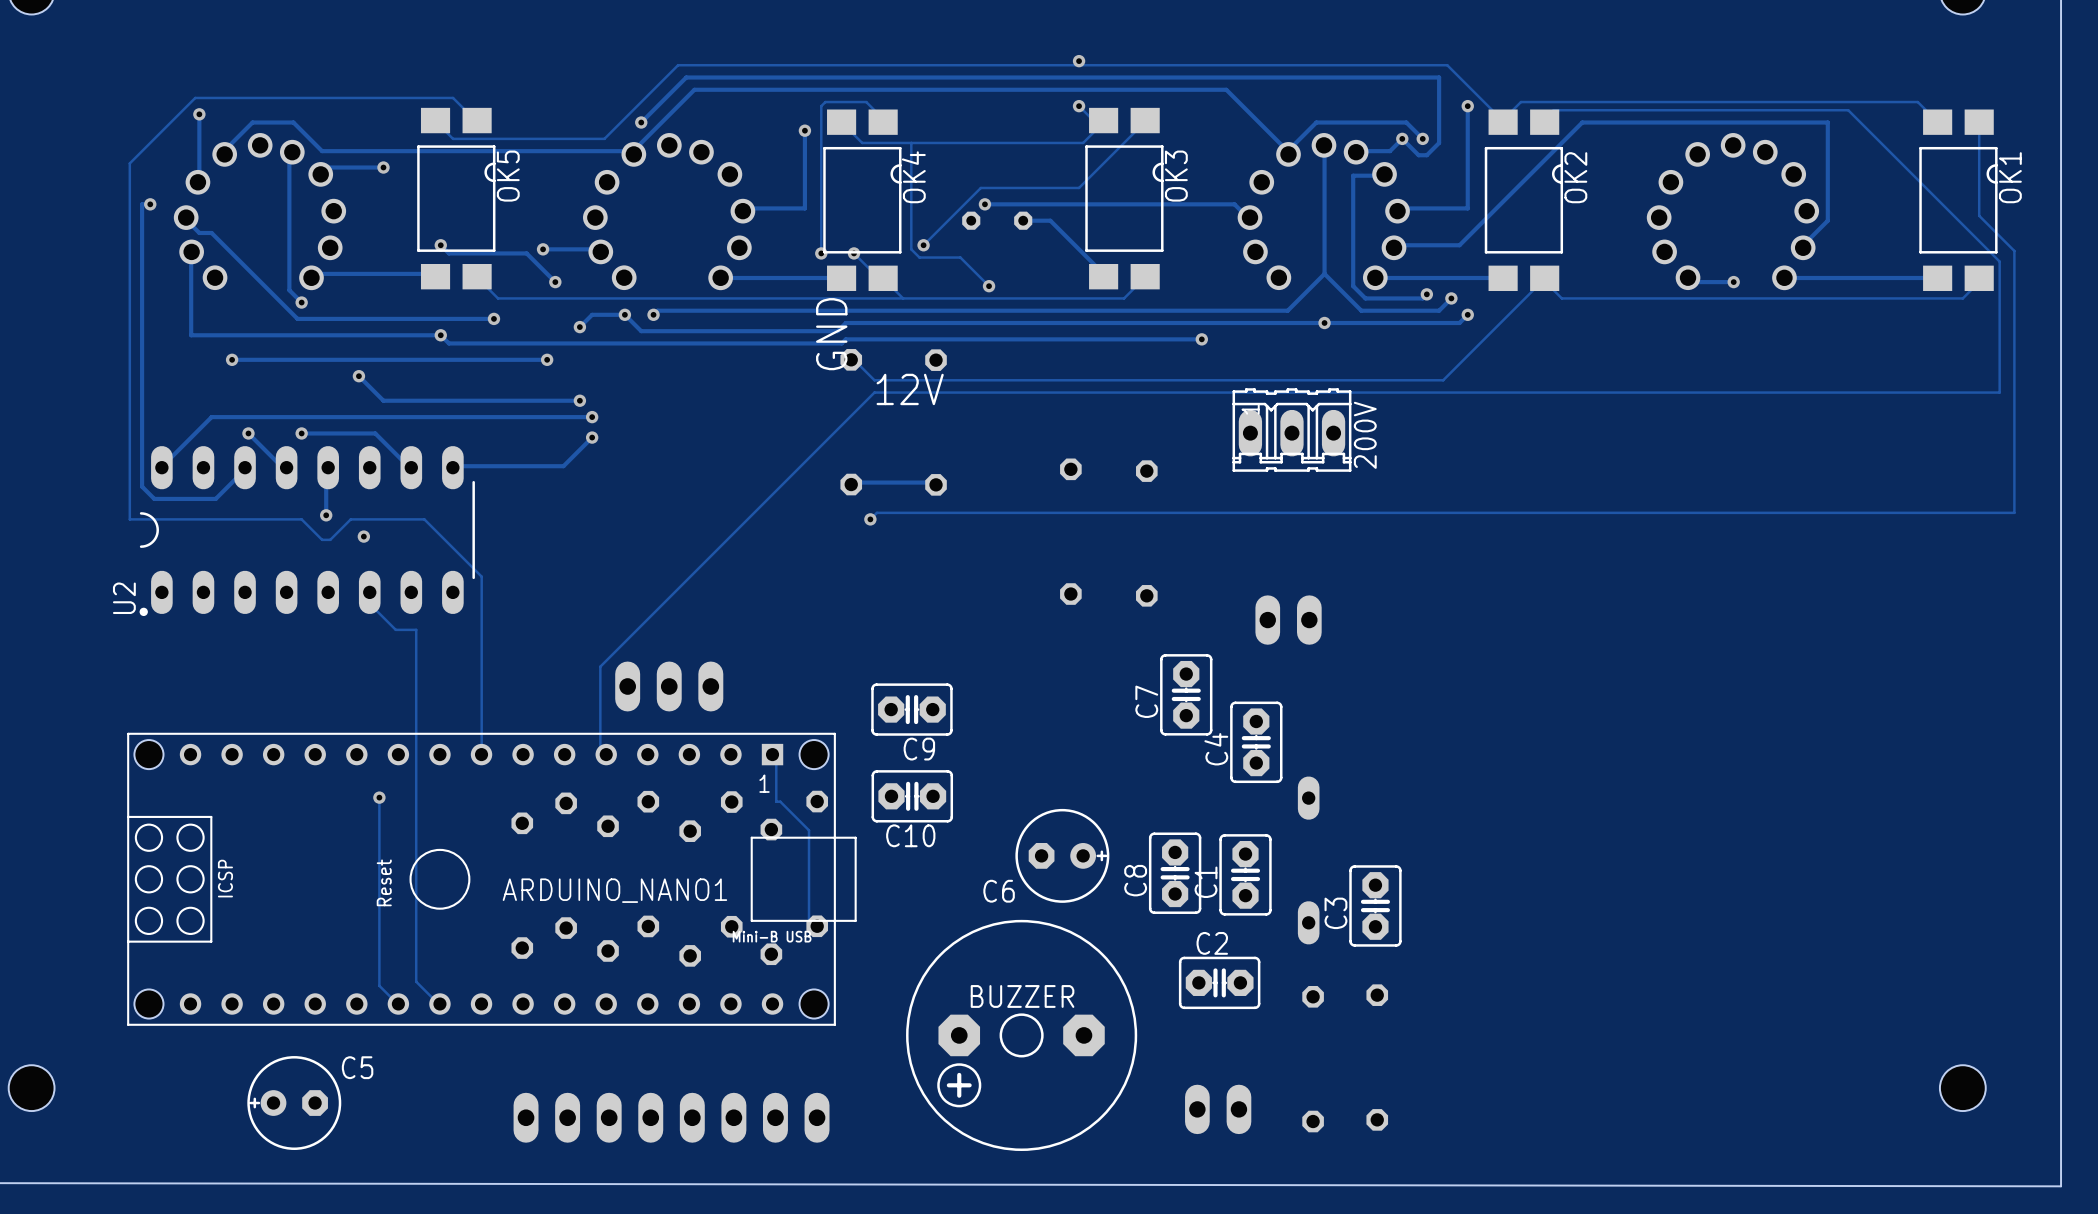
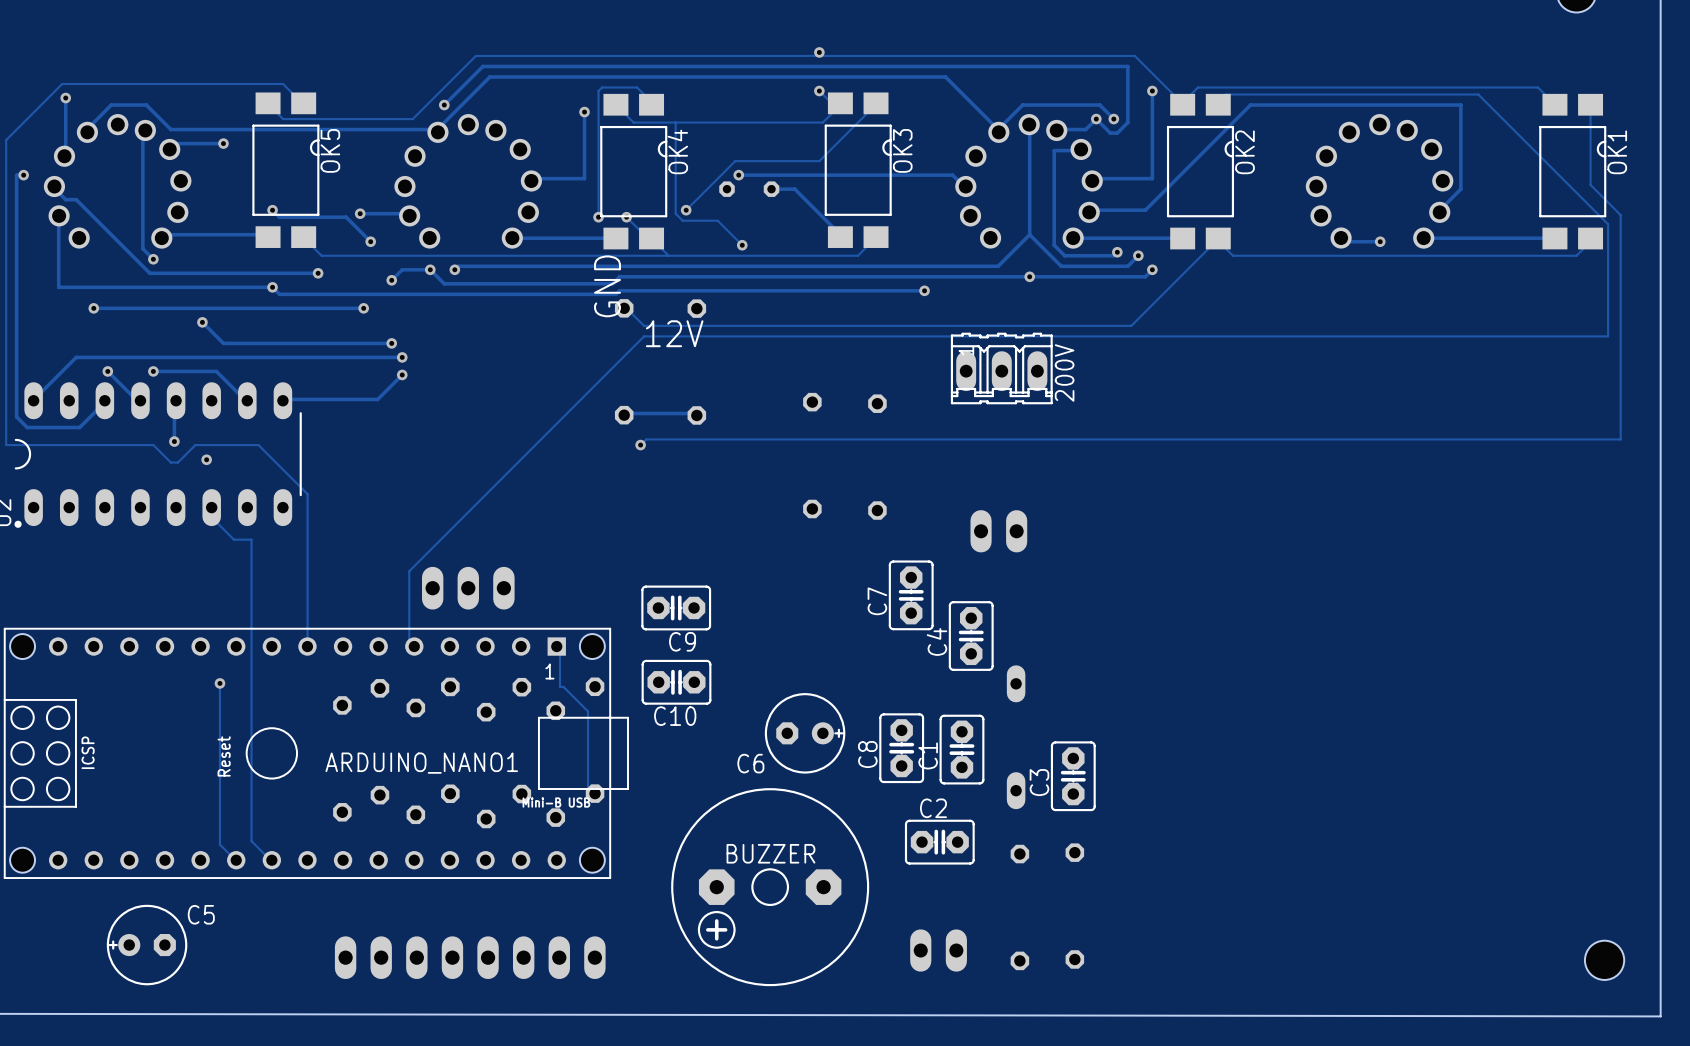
part position: (1962, 1088) -> (1604, 960)

